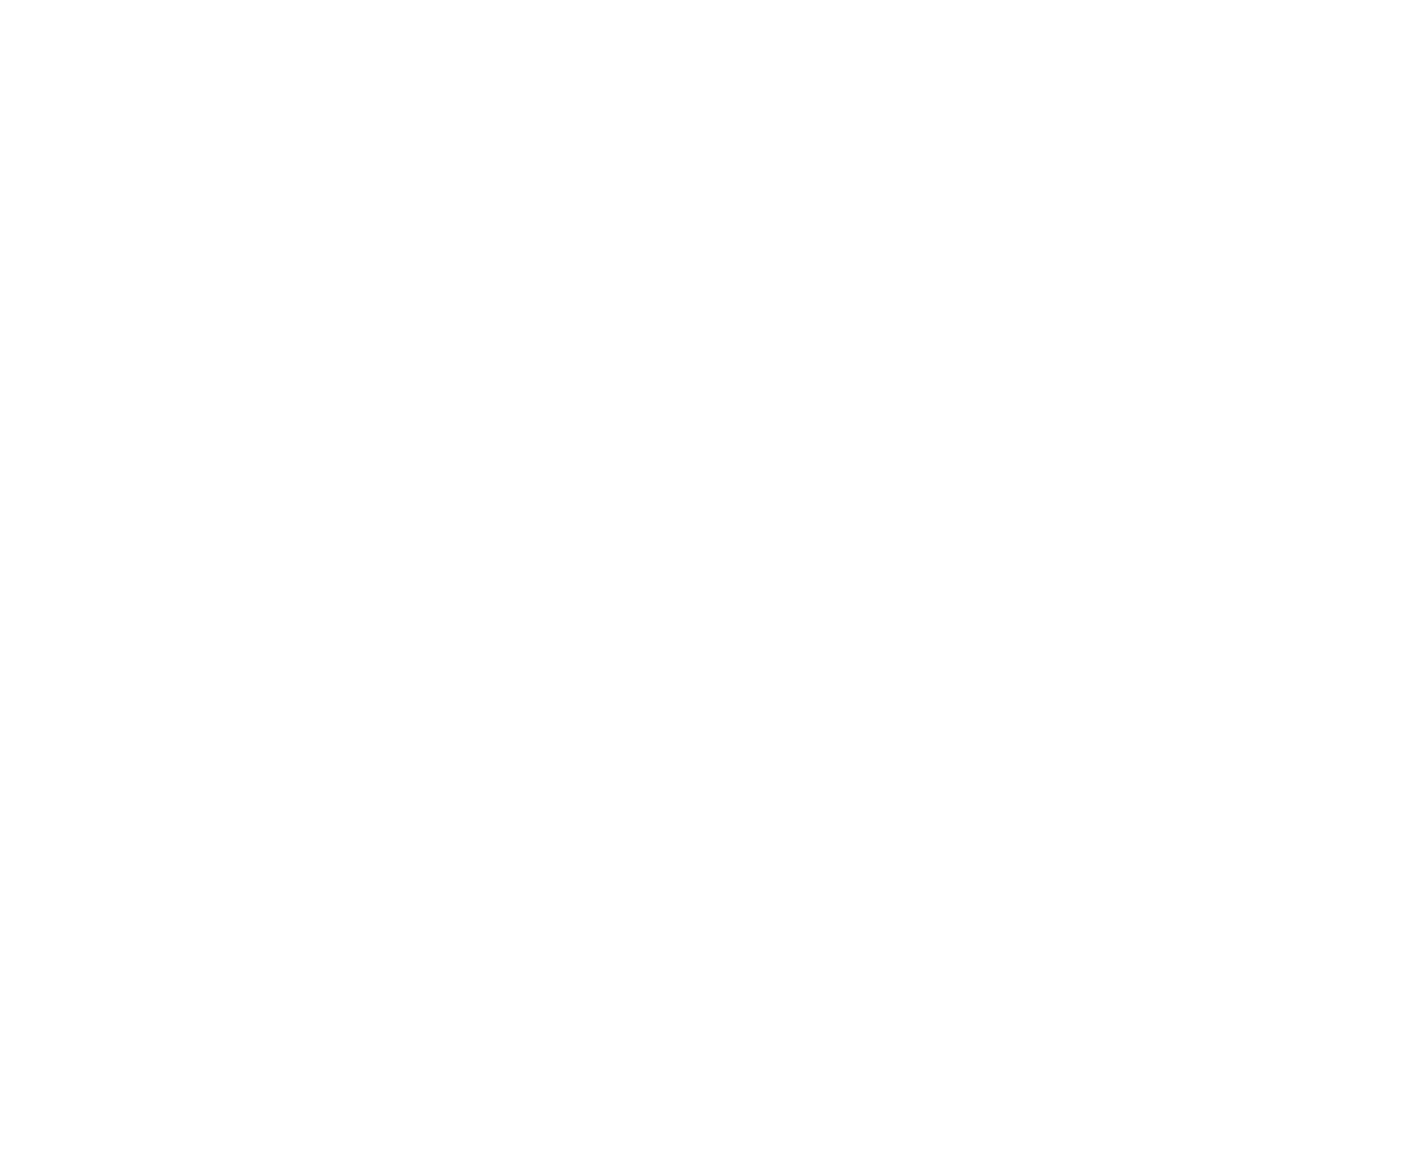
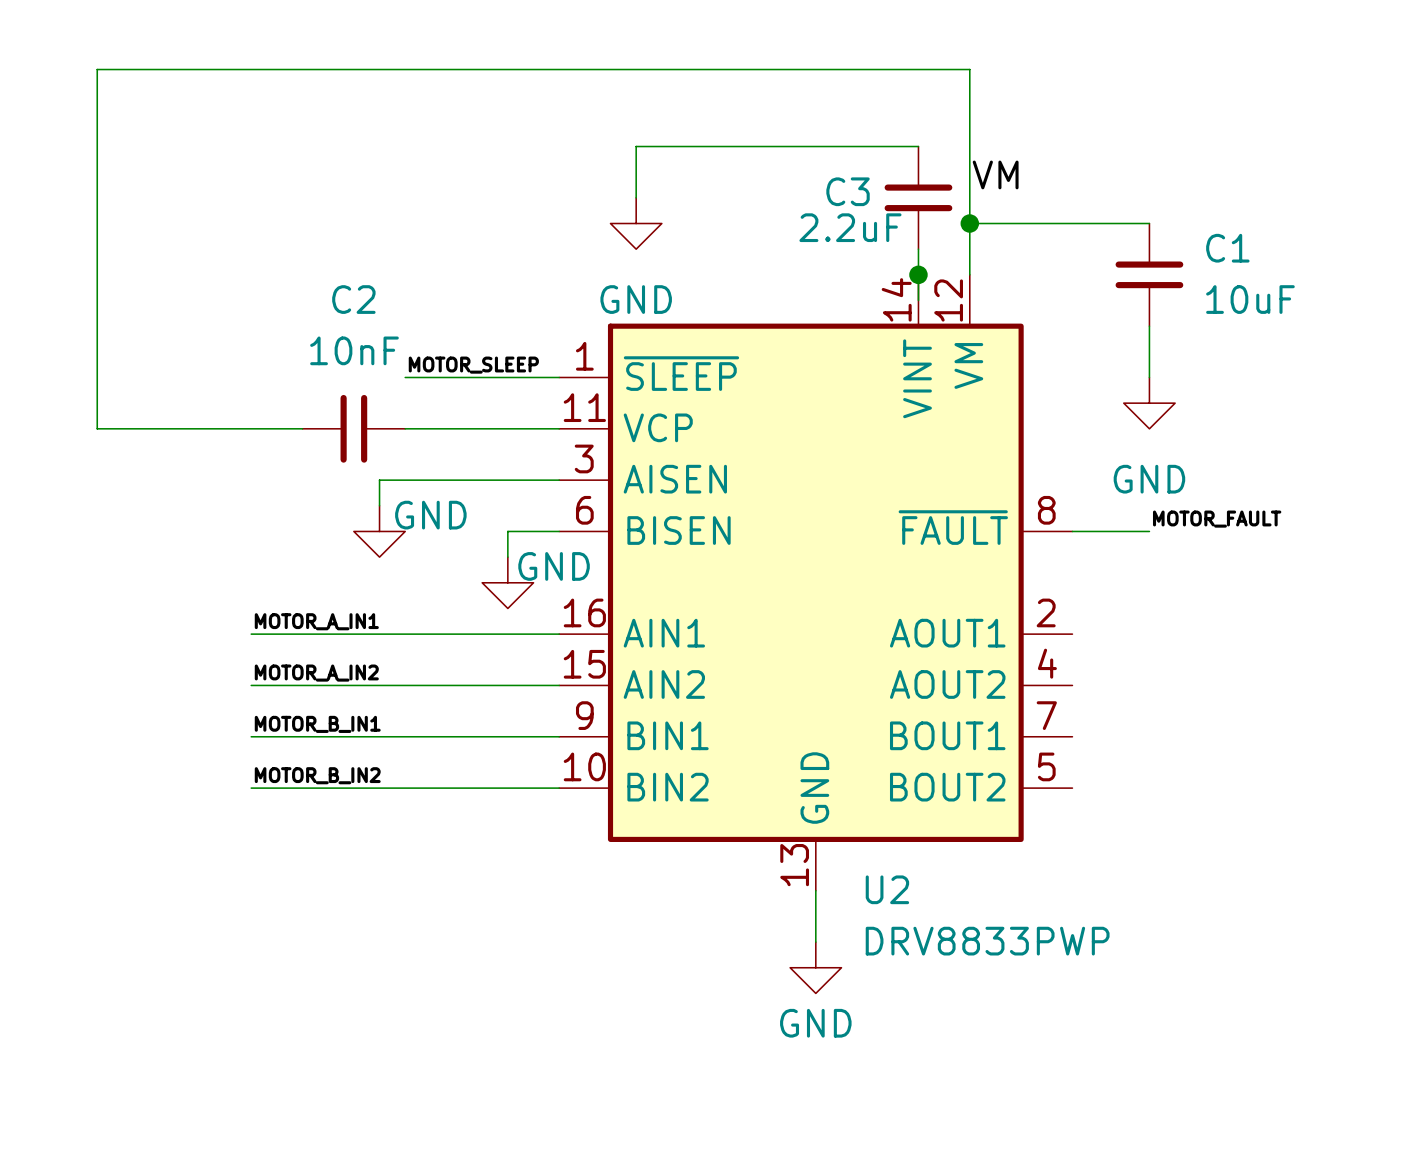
wire: none -> (918, 146) (636, 146) (636, 197)
label: none -> VM (995, 174)
C3: none -> 2.2uF (918, 197)
power symbol: none -> GND (636, 223)
wire: none -> (969, 223) (1149, 223)
junction: none -> (969, 223)
wire: none -> (918, 249) (918, 300)
junction: none -> (918, 274)
wire: none -> (969, 274) (969, 69) (97, 69) (97, 428) (302, 428)
C1: none -> 10uF (1149, 274)
wire: none -> (1149, 326) (1149, 377)
label: none -> MOTOR_SLEEP (473, 365)
wire: none -> (405, 377) (559, 377)
power symbol: none -> GND (1149, 403)
C2: none -> 10nF (353, 428)
wire: none -> (405, 428) (559, 428)
wire: none -> (559, 480) (379, 480) (379, 505)
label: none -> MOTOR_FAULT (1217, 519)
power symbol: none -> GND (379, 531)
wire: none -> (559, 531) (507, 531) (507, 557)
wire: none -> (1072, 531) (1149, 531)
power symbol: none -> GND (507, 582)
U2: none -> DRV8833PWP (815, 582)
label: none -> MOTOR_A_IN1 (316, 621)
wire: none -> (251, 634) (559, 634)
label: none -> MOTOR_A_IN2 (316, 673)
wire: none -> (251, 685) (559, 685)
label: none -> MOTOR_B_IN1 (317, 724)
wire: none -> (251, 736) (559, 736)
label: none -> MOTOR_B_IN2 (317, 775)
wire: none -> (251, 788) (559, 788)
wire: none -> (815, 890) (815, 942)
power symbol: none -> GND (815, 967)

